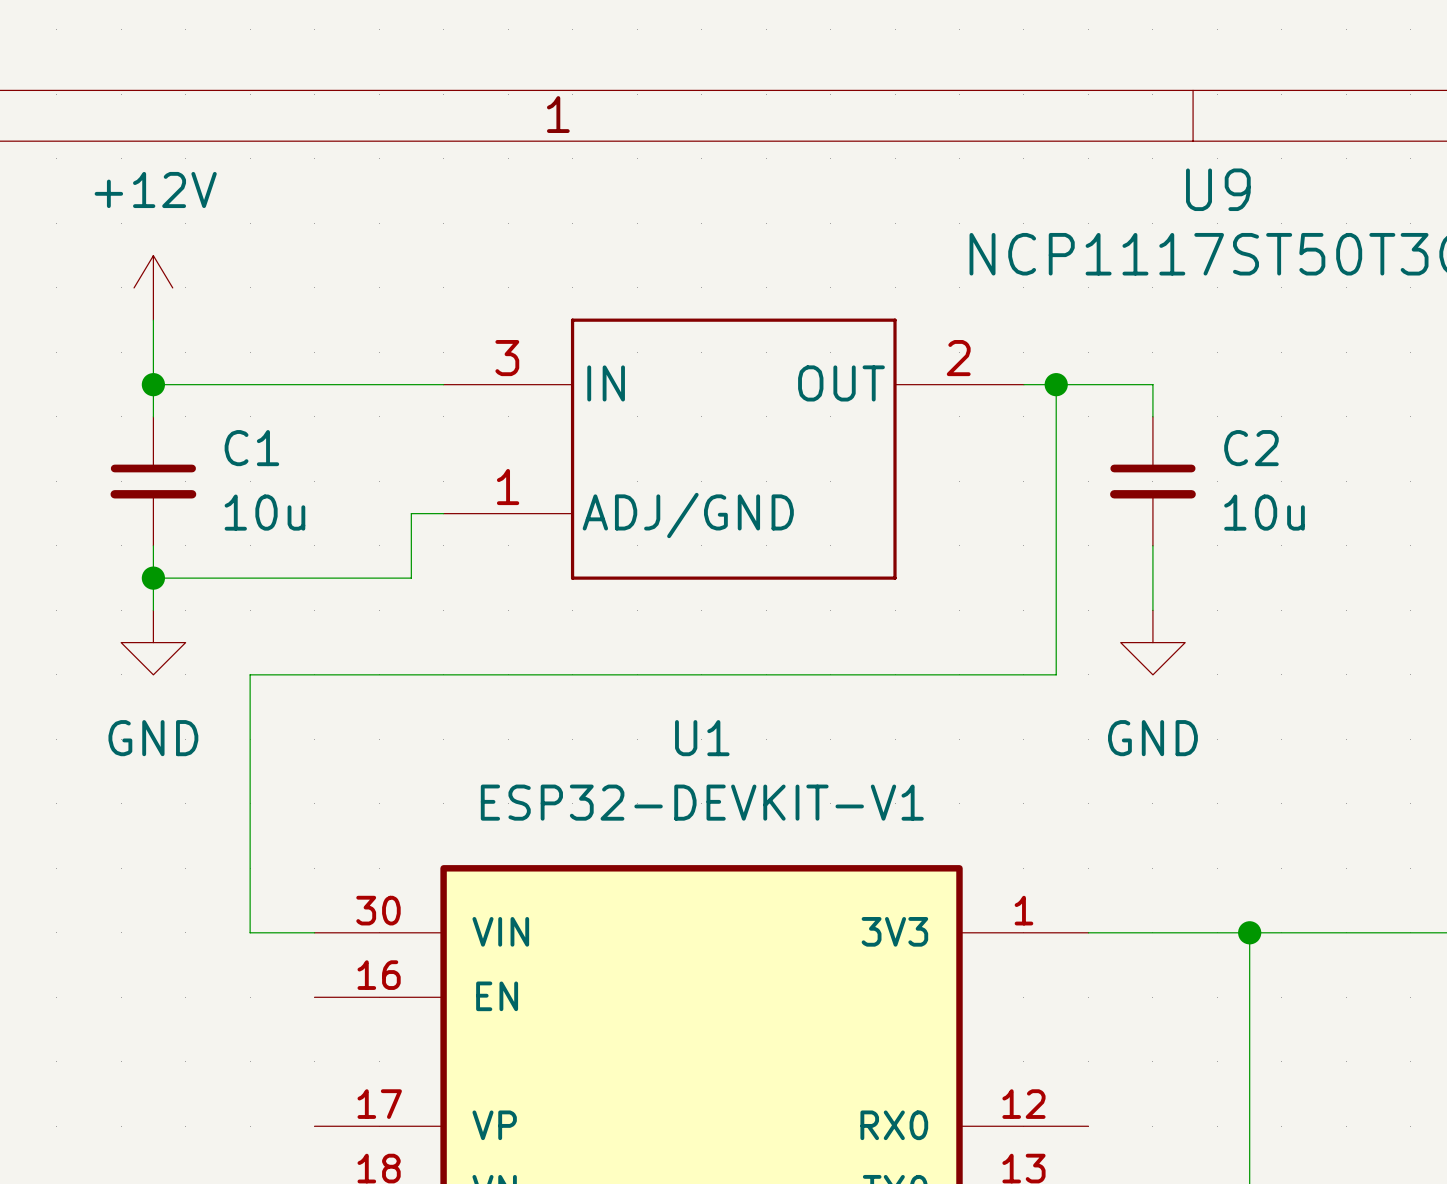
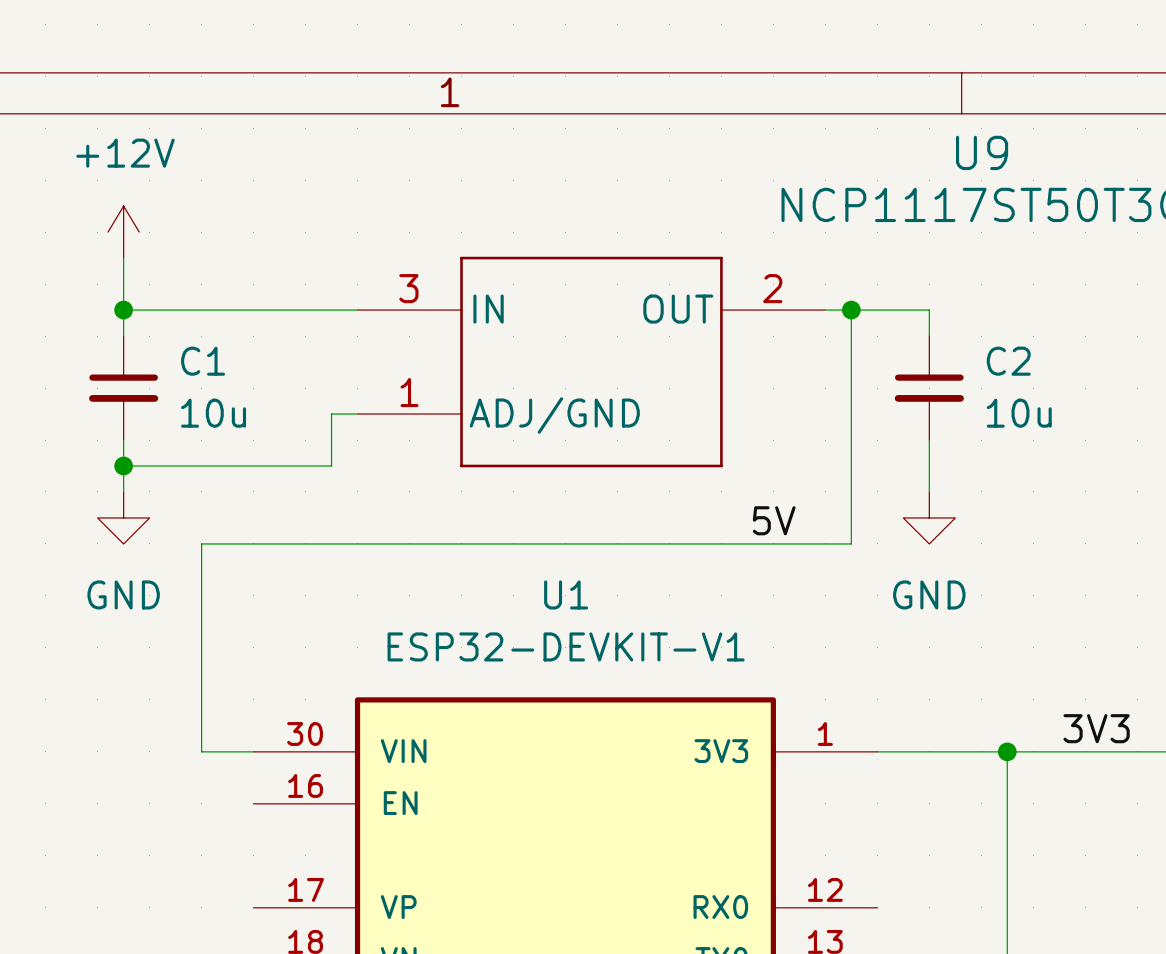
label: none -> 5V (774, 520)
label: none -> 3V3 (1096, 728)

